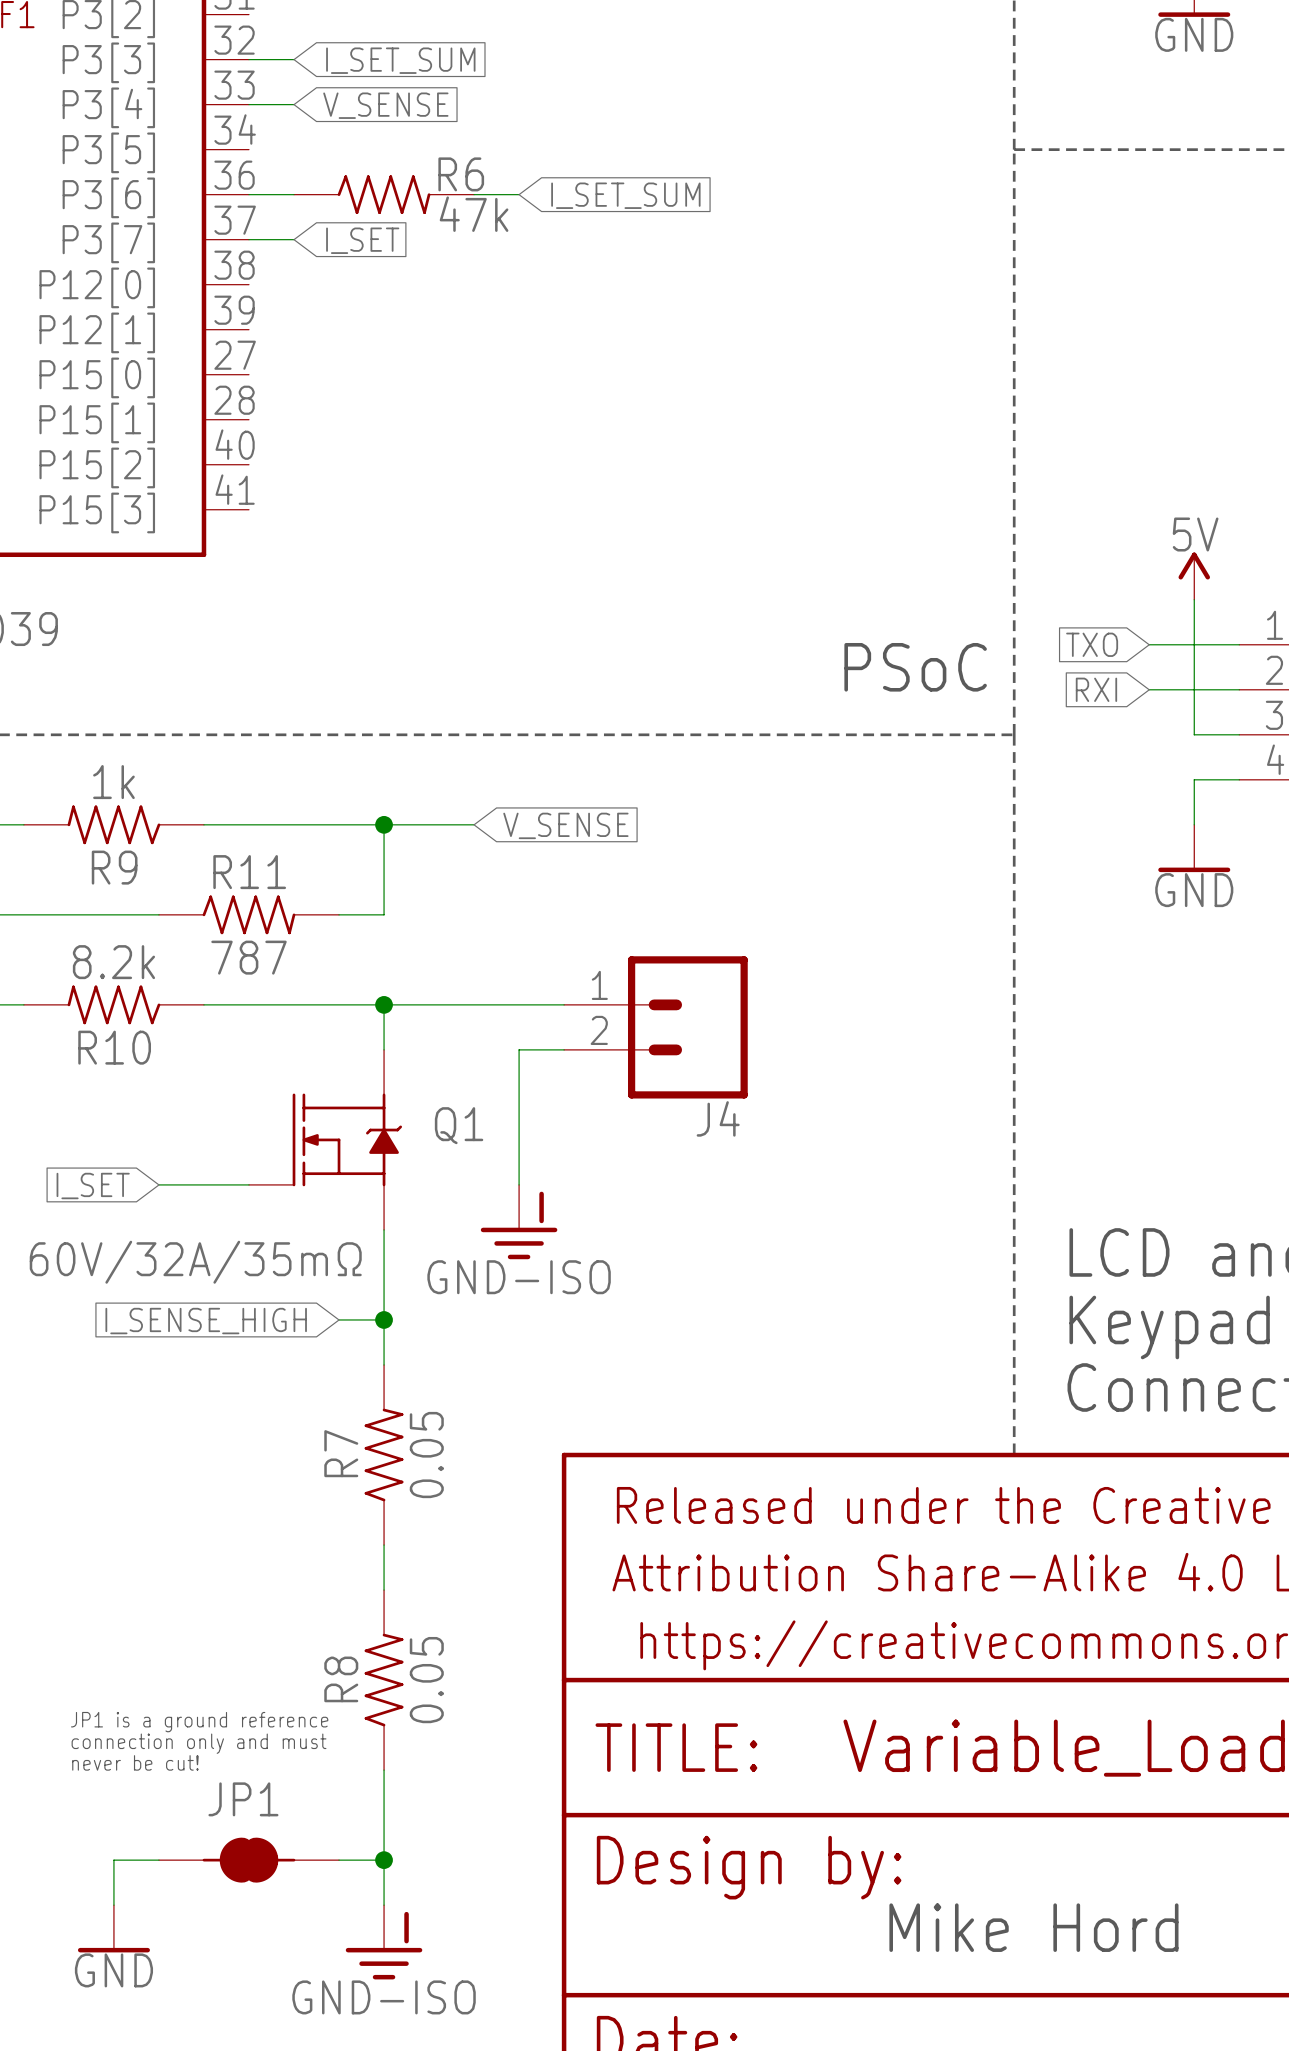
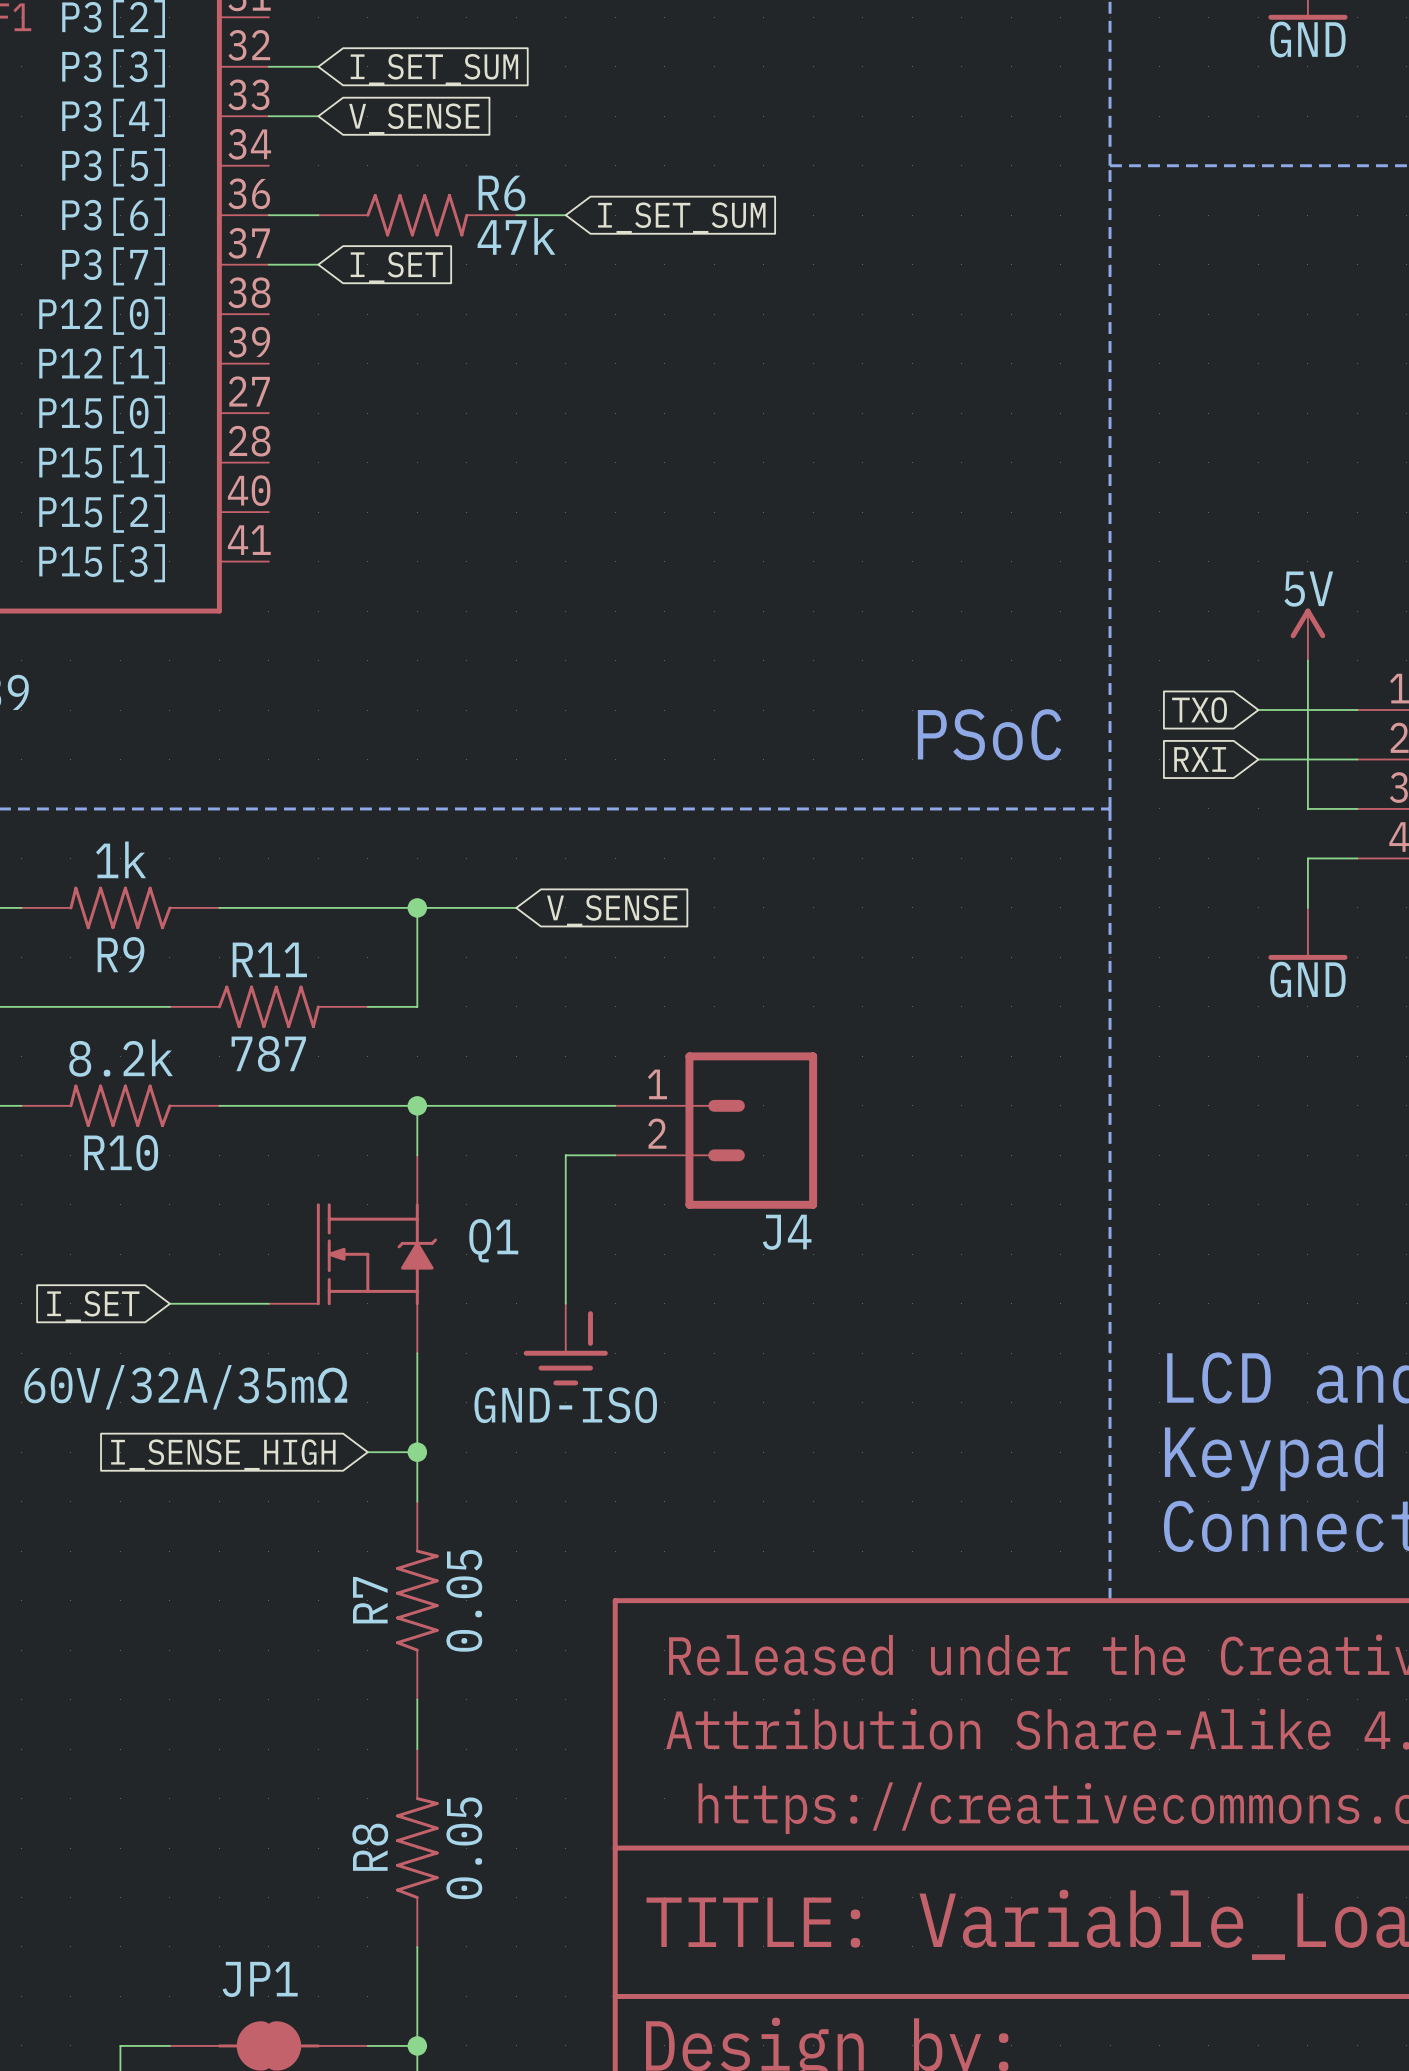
text: JP1 is a ground reference (199, 1722) -> none
text: connection only and must (199, 1743) -> none
text: never be cut! (135, 1762) -> none

